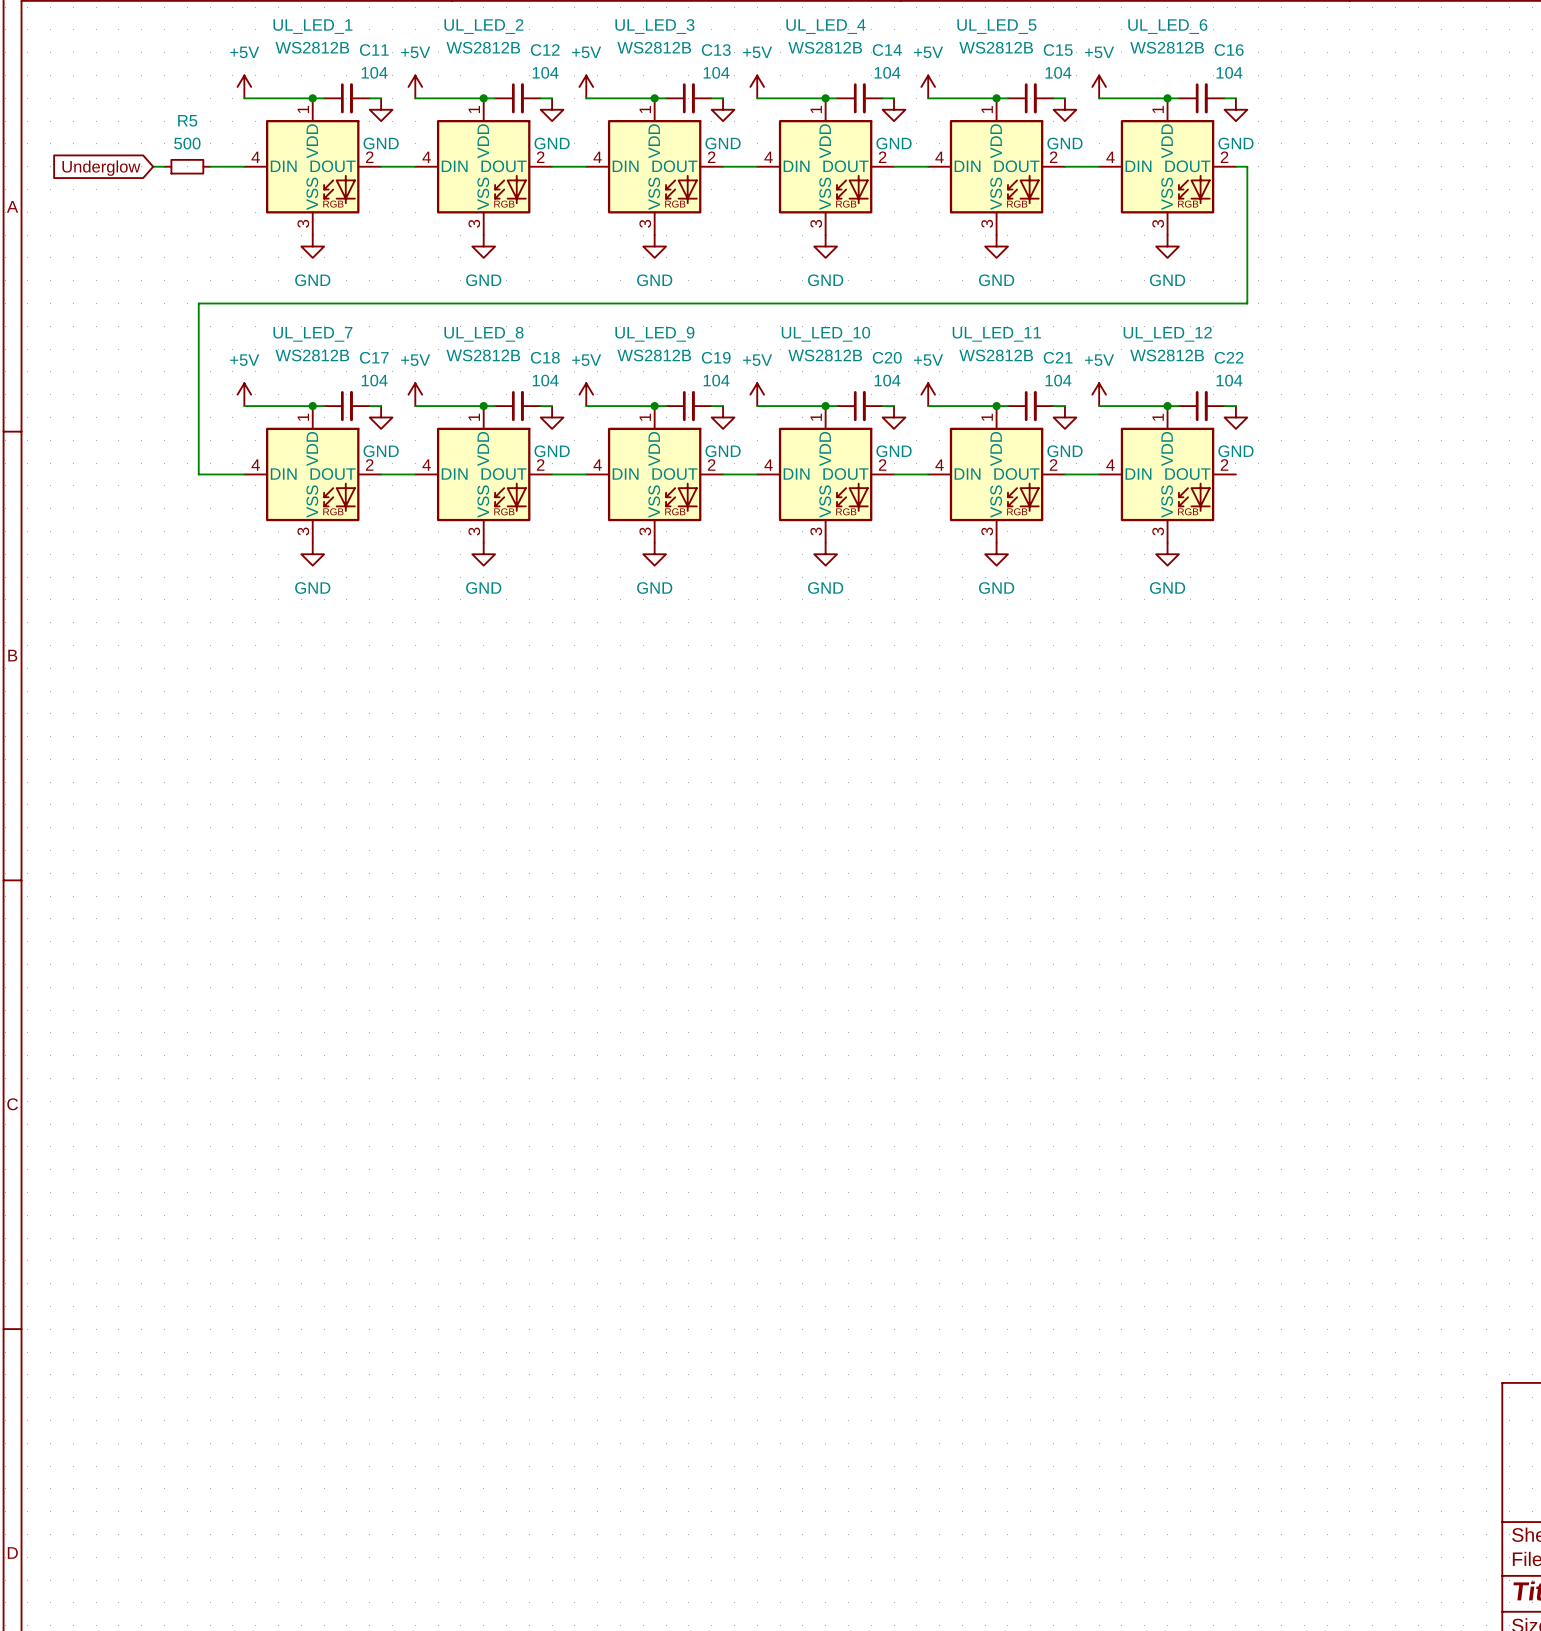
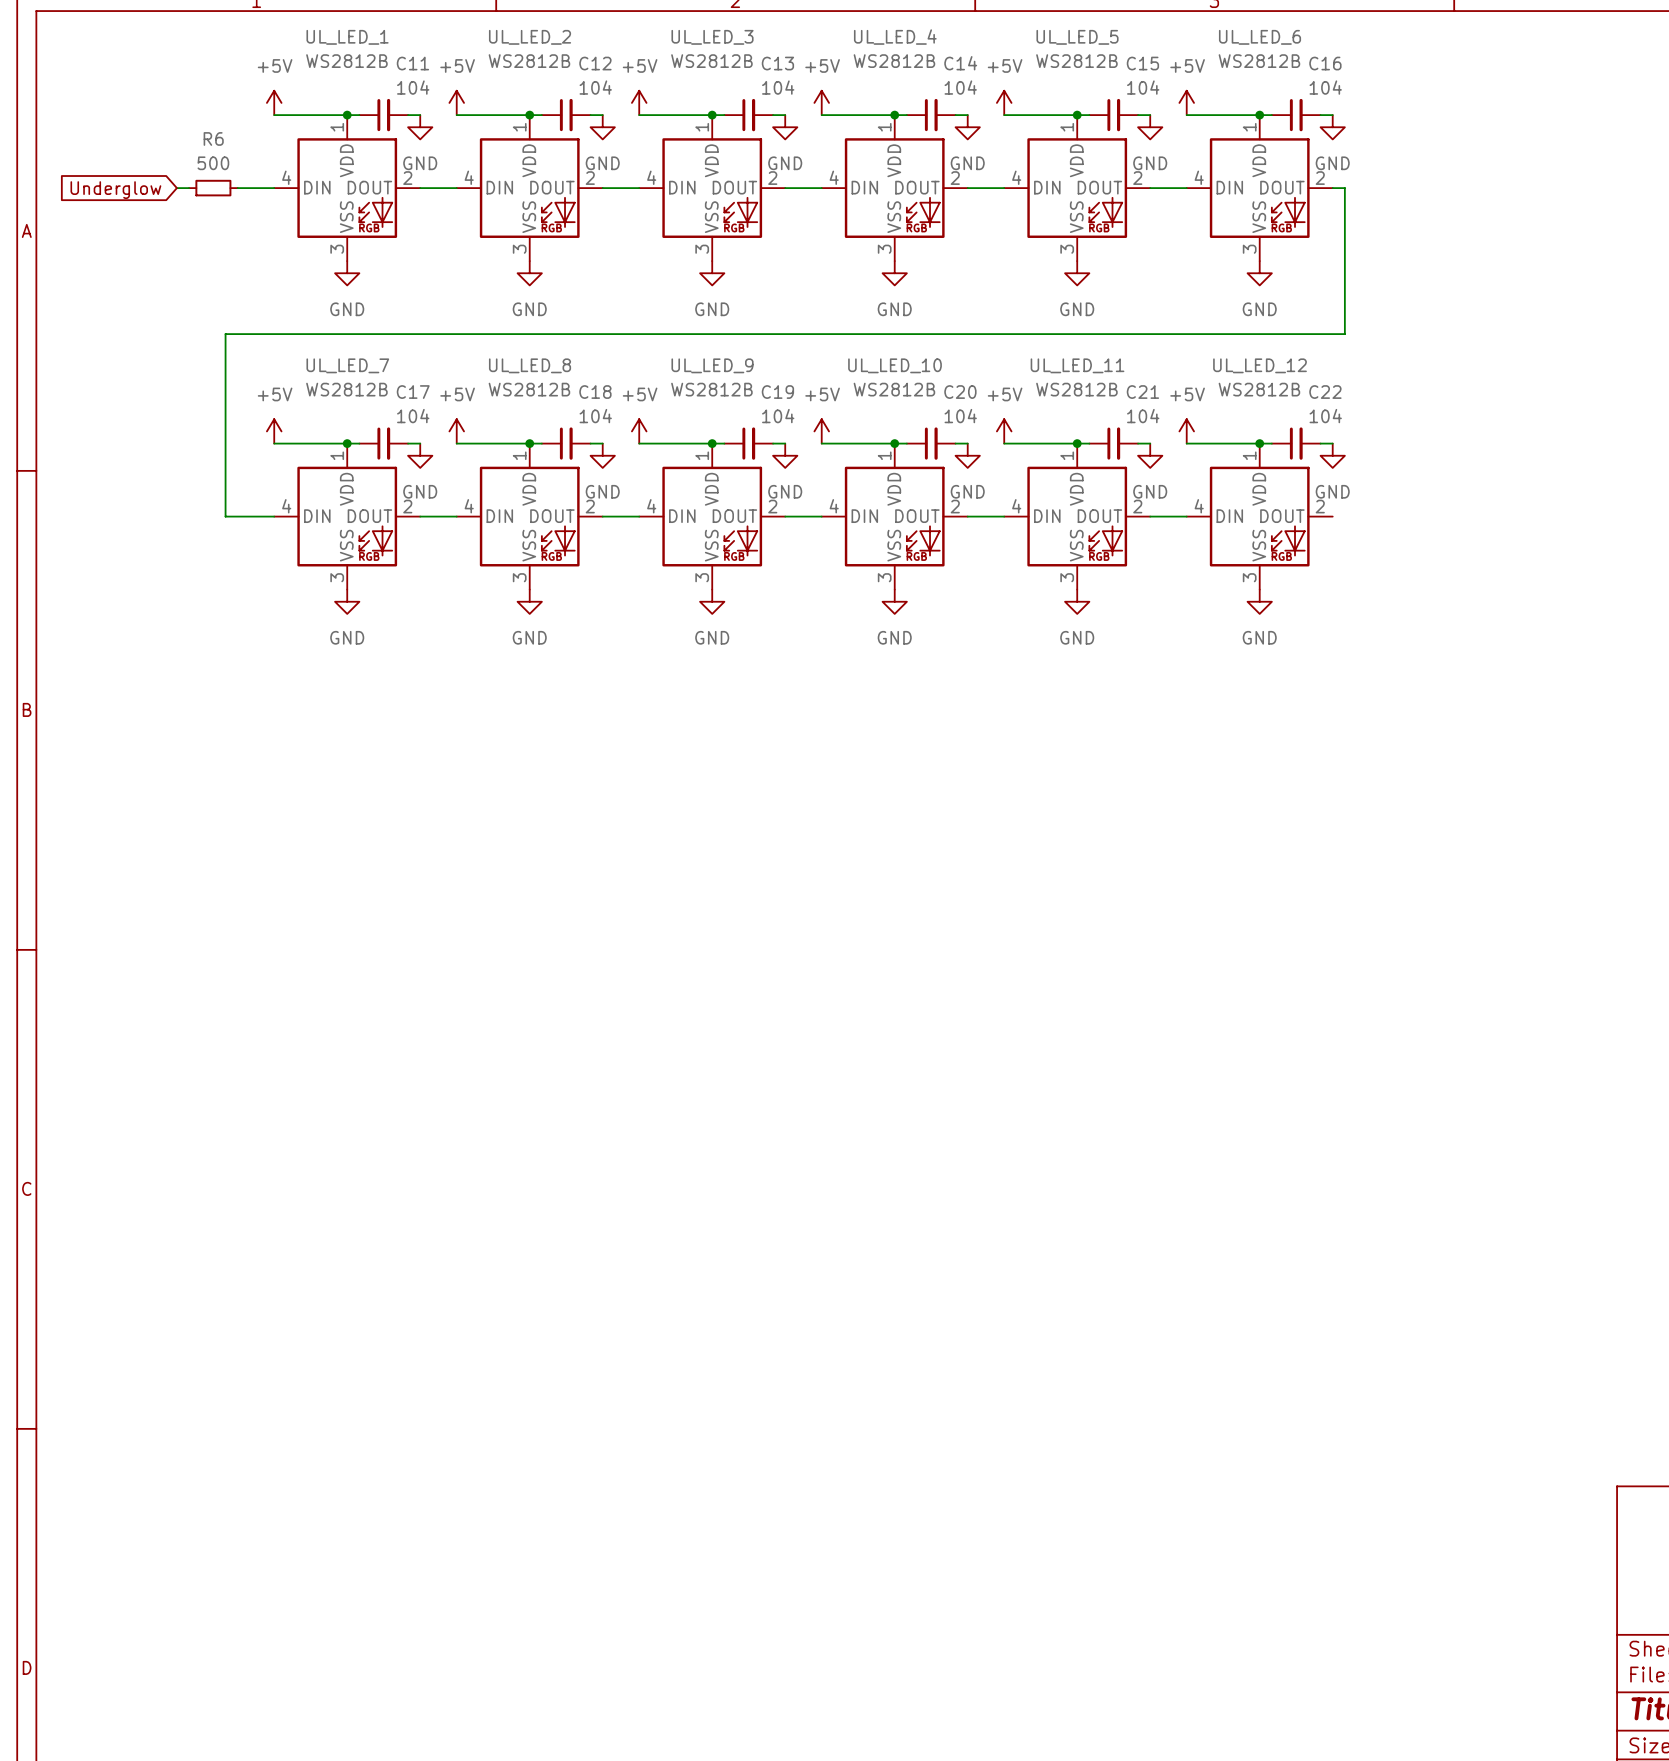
R5 name: R5 (187, 120) -> R6 (213, 138)

